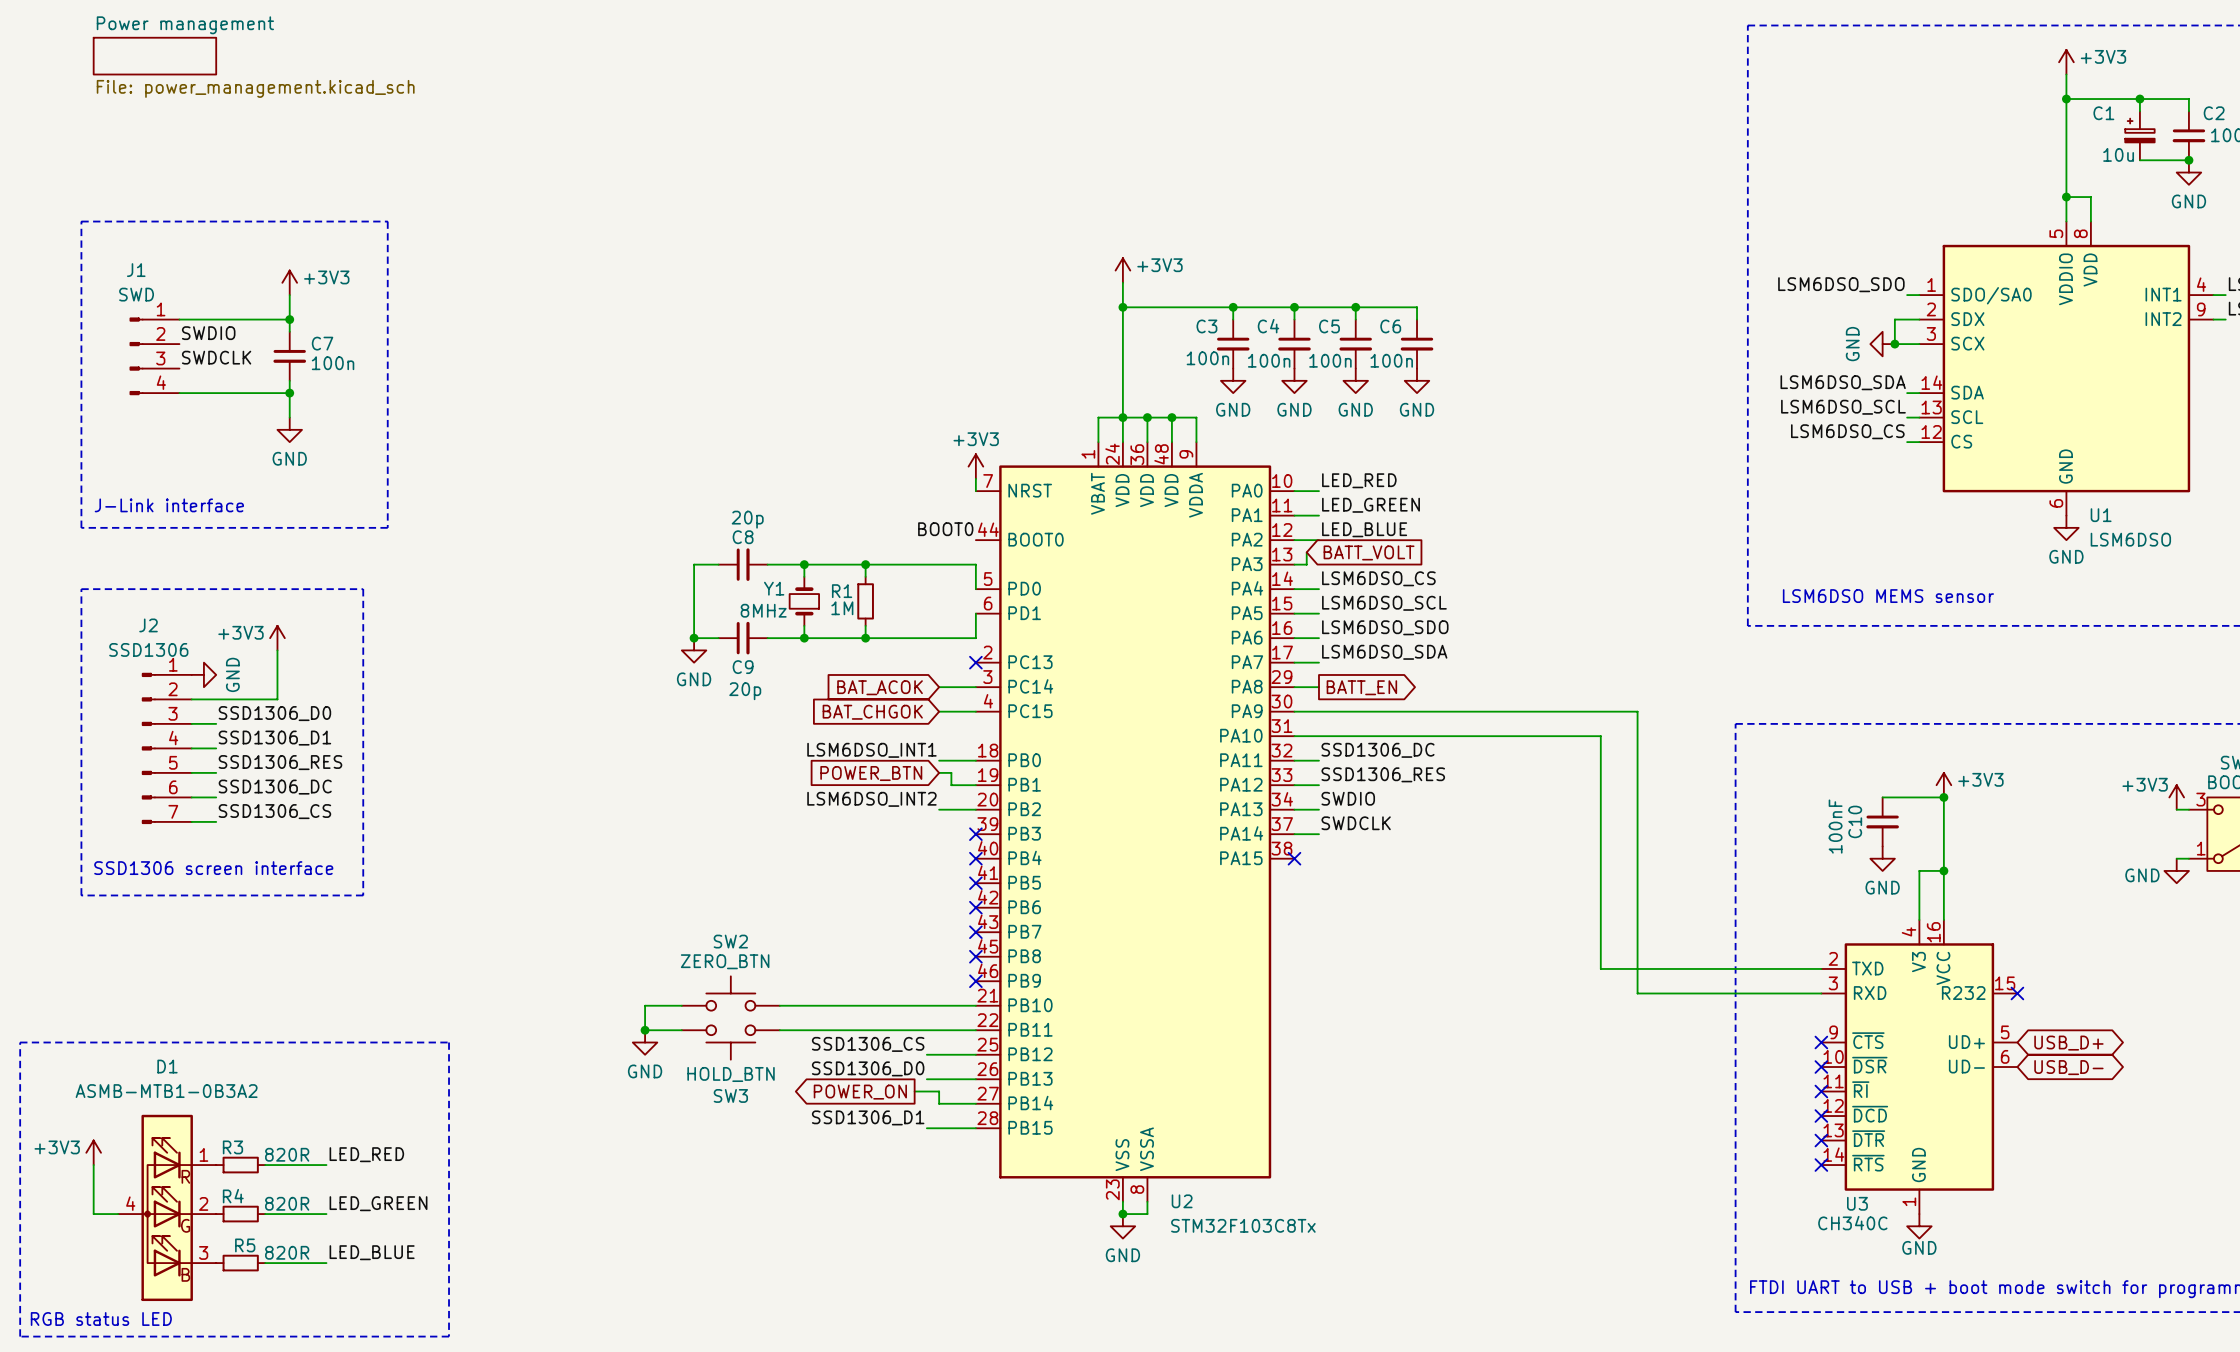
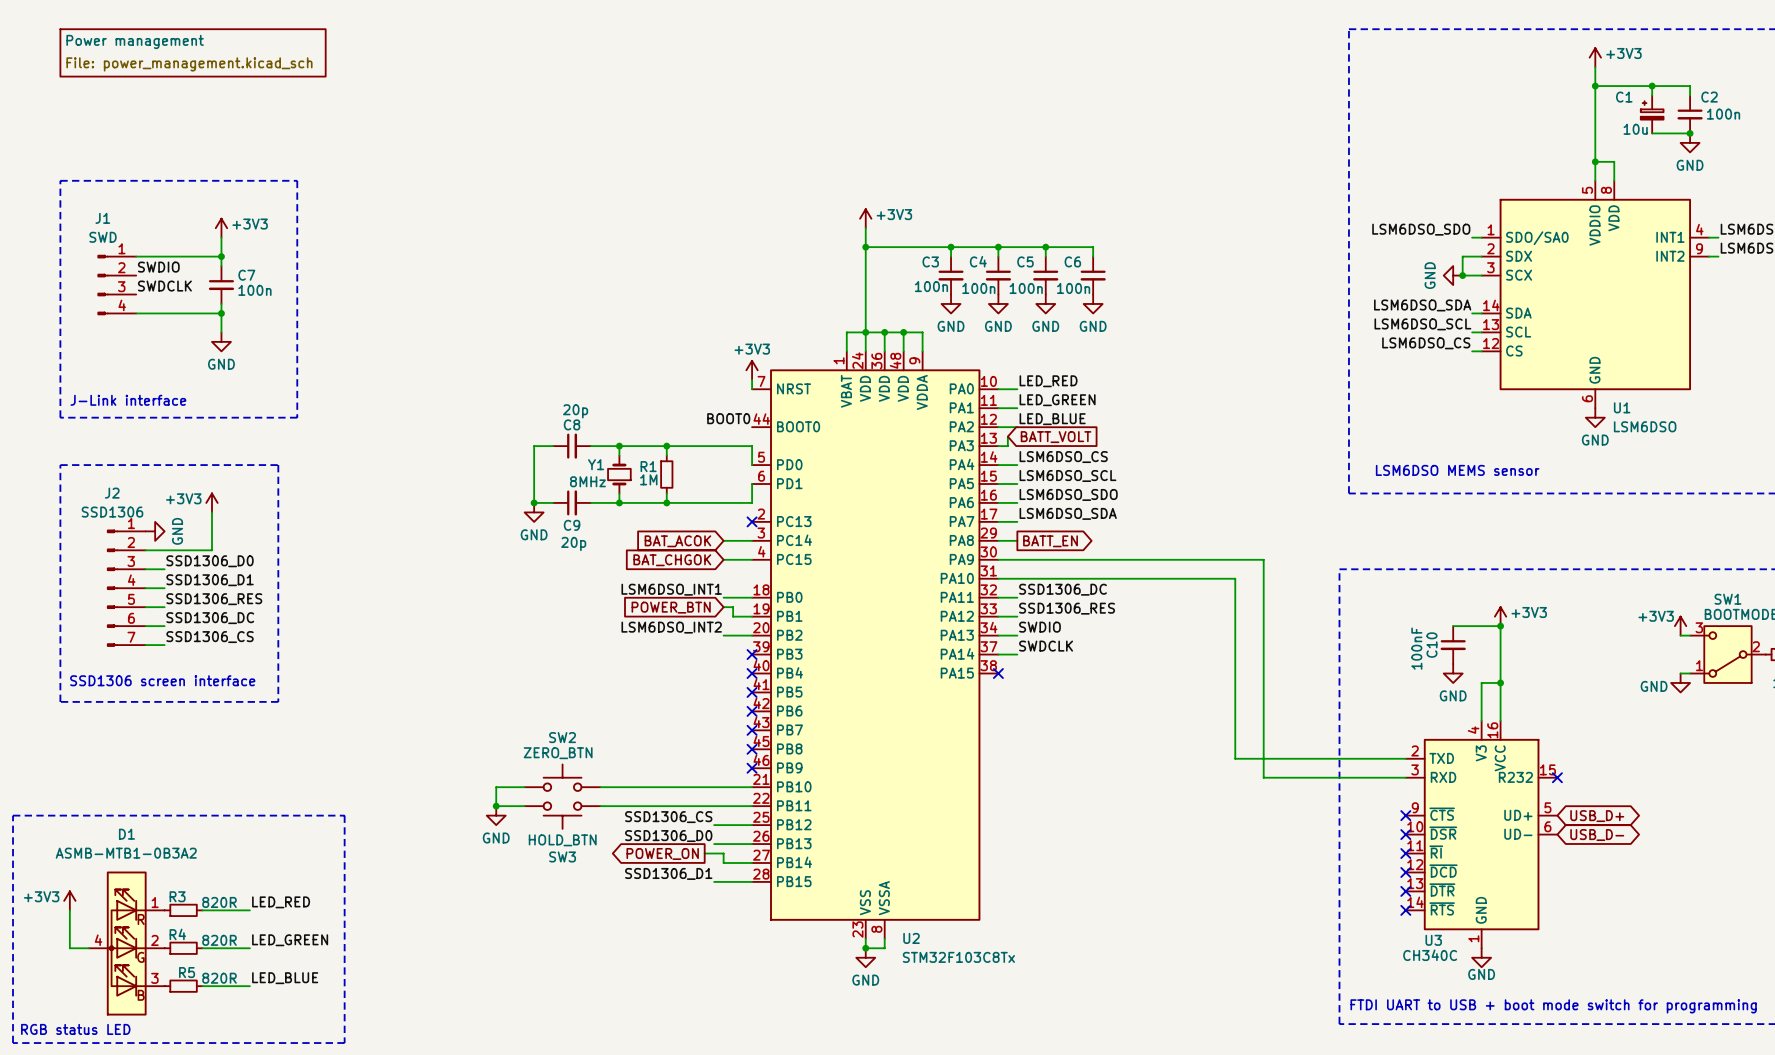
sheet Power management: File: power_management.kicad_sch (154, 56) -> none
sheet Power management: none -> File: power_management.kicad_sch (193, 52)

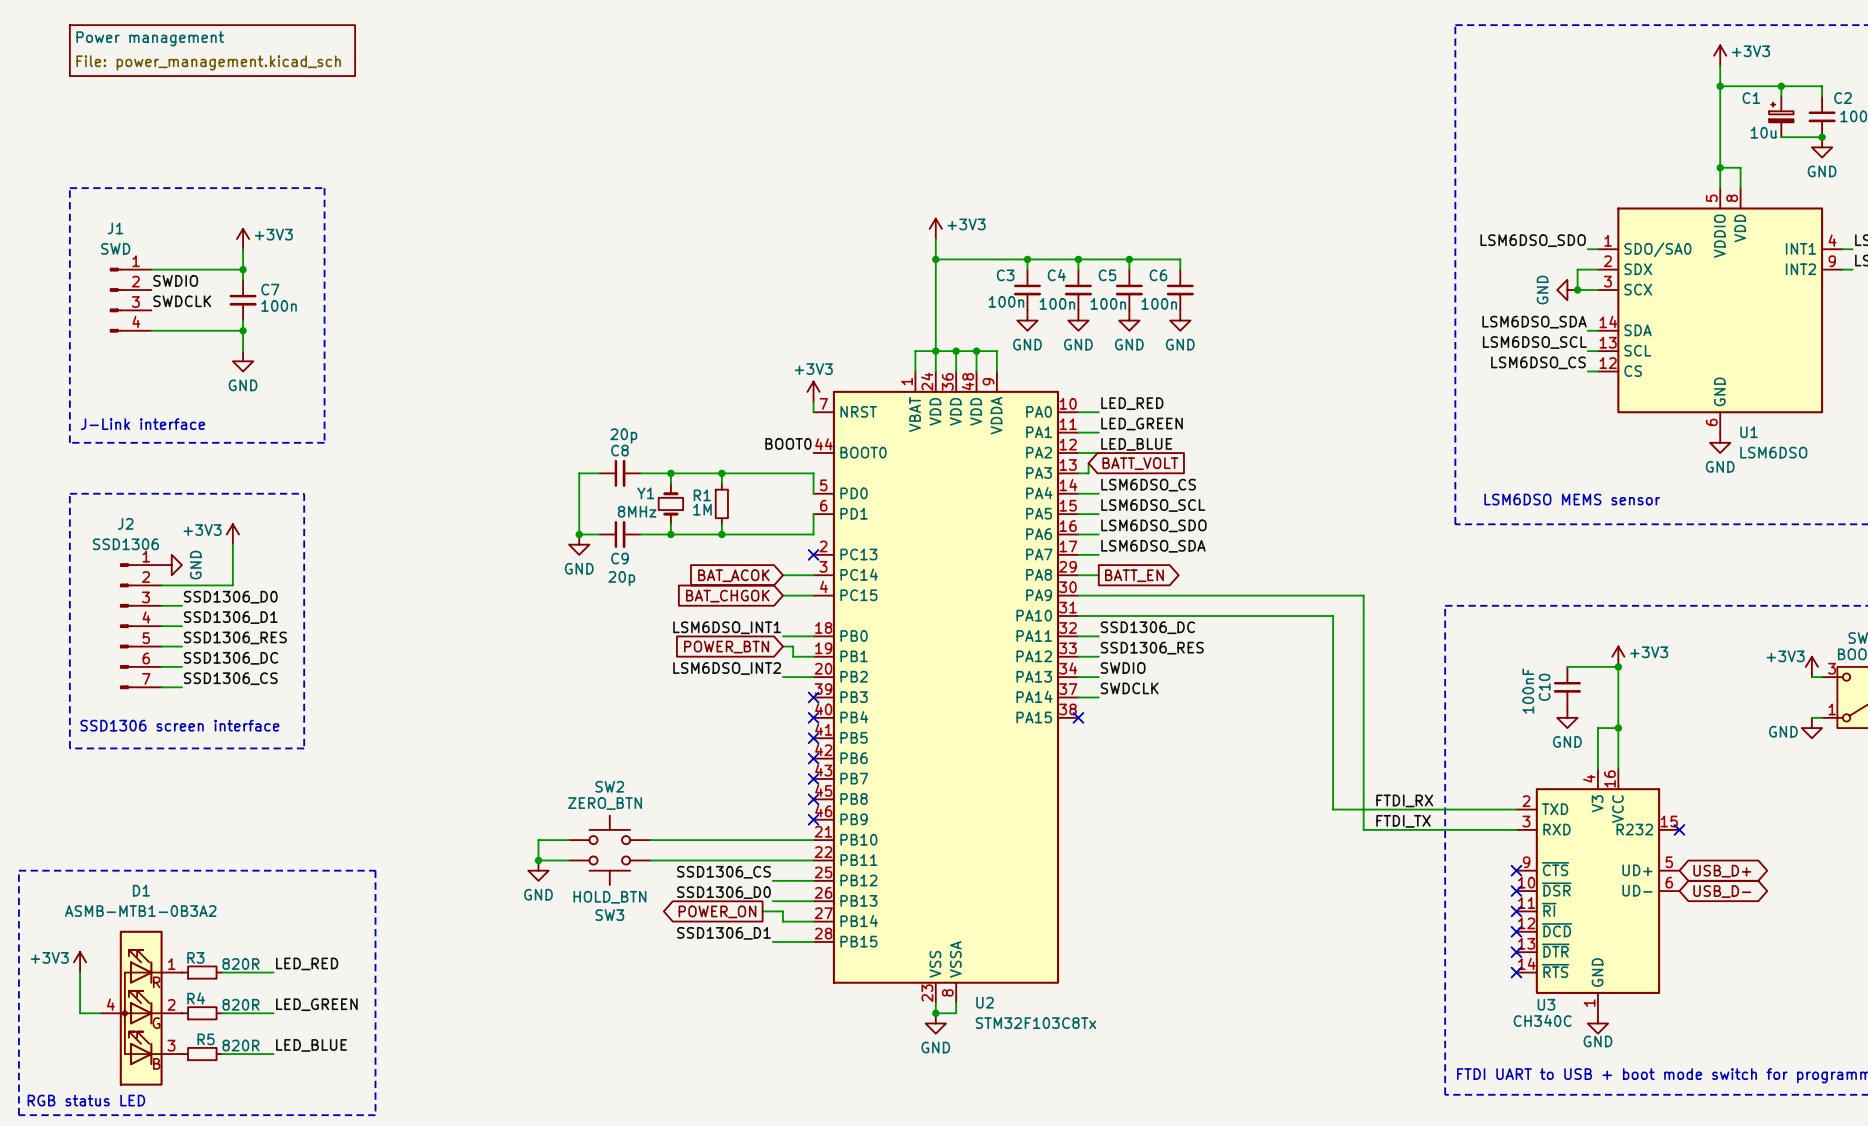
label: none -> FTDI_RX (1404, 800)
label: none -> FTDI_TX (1403, 821)

